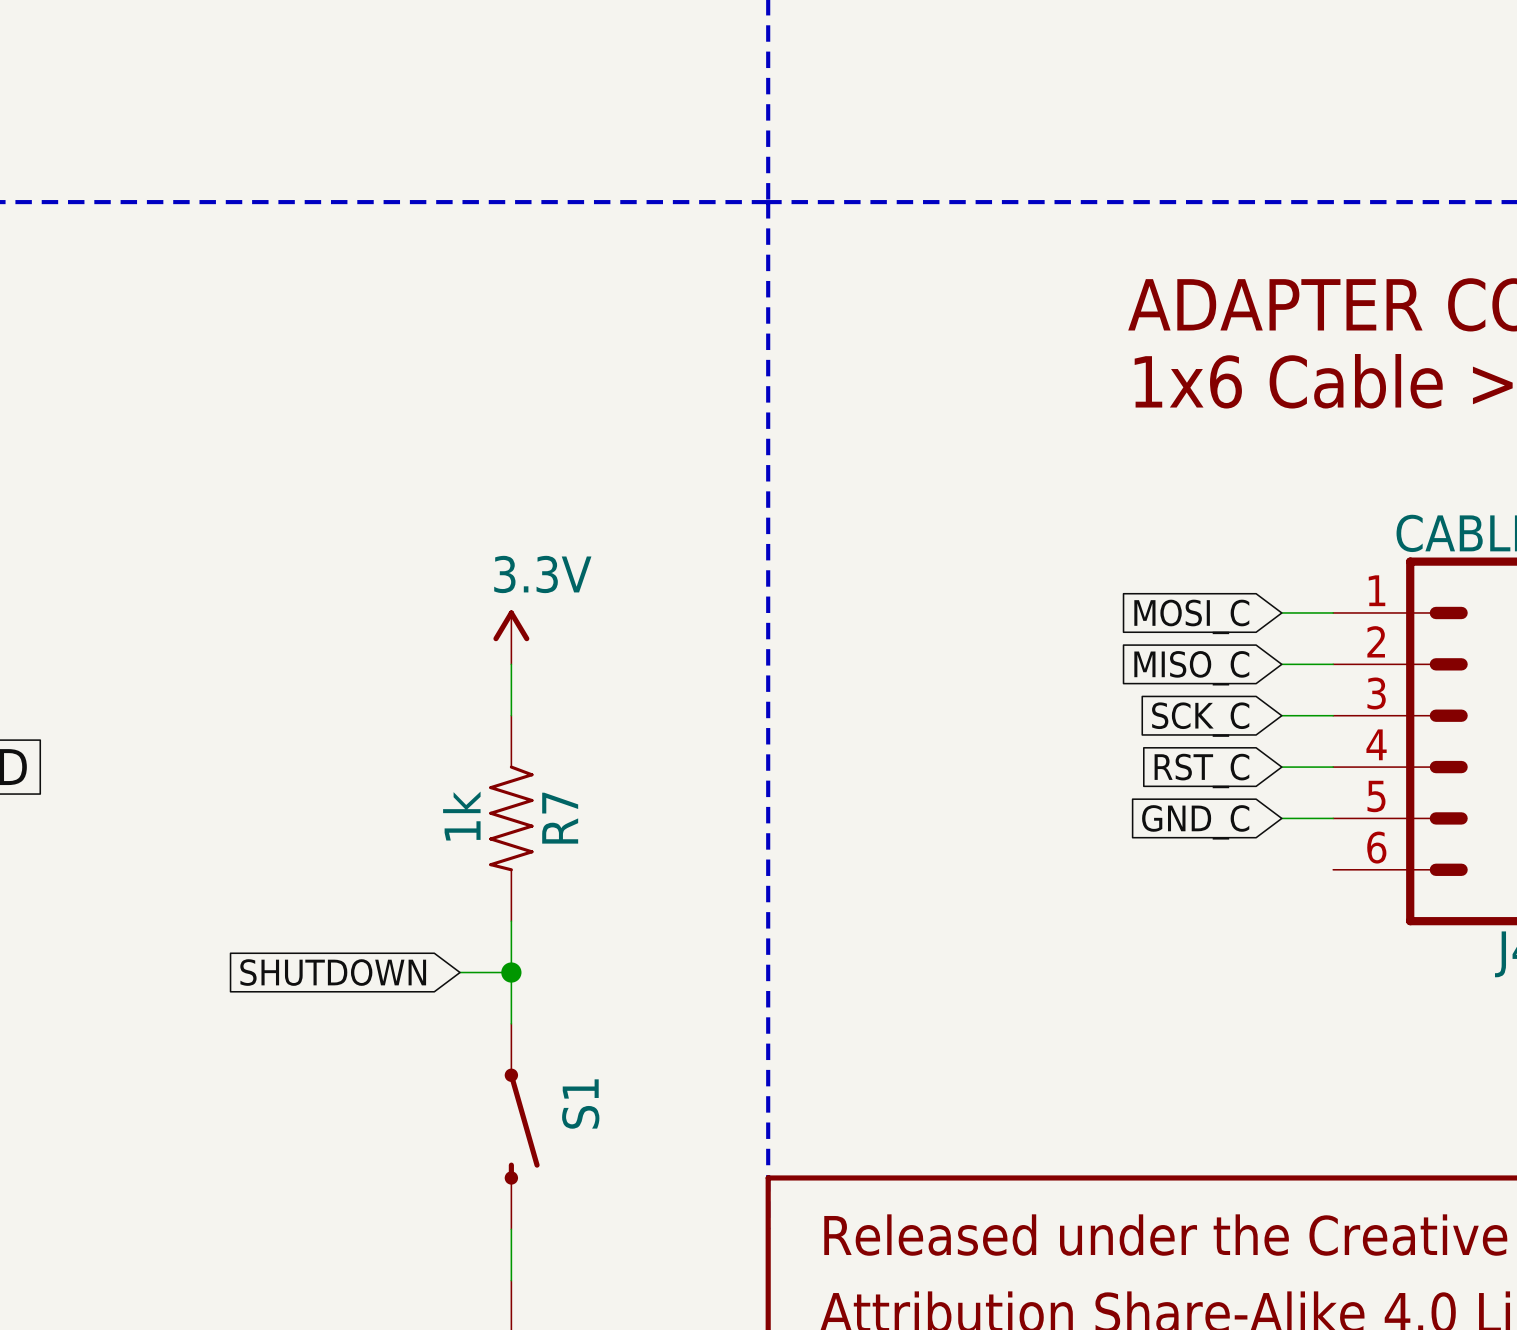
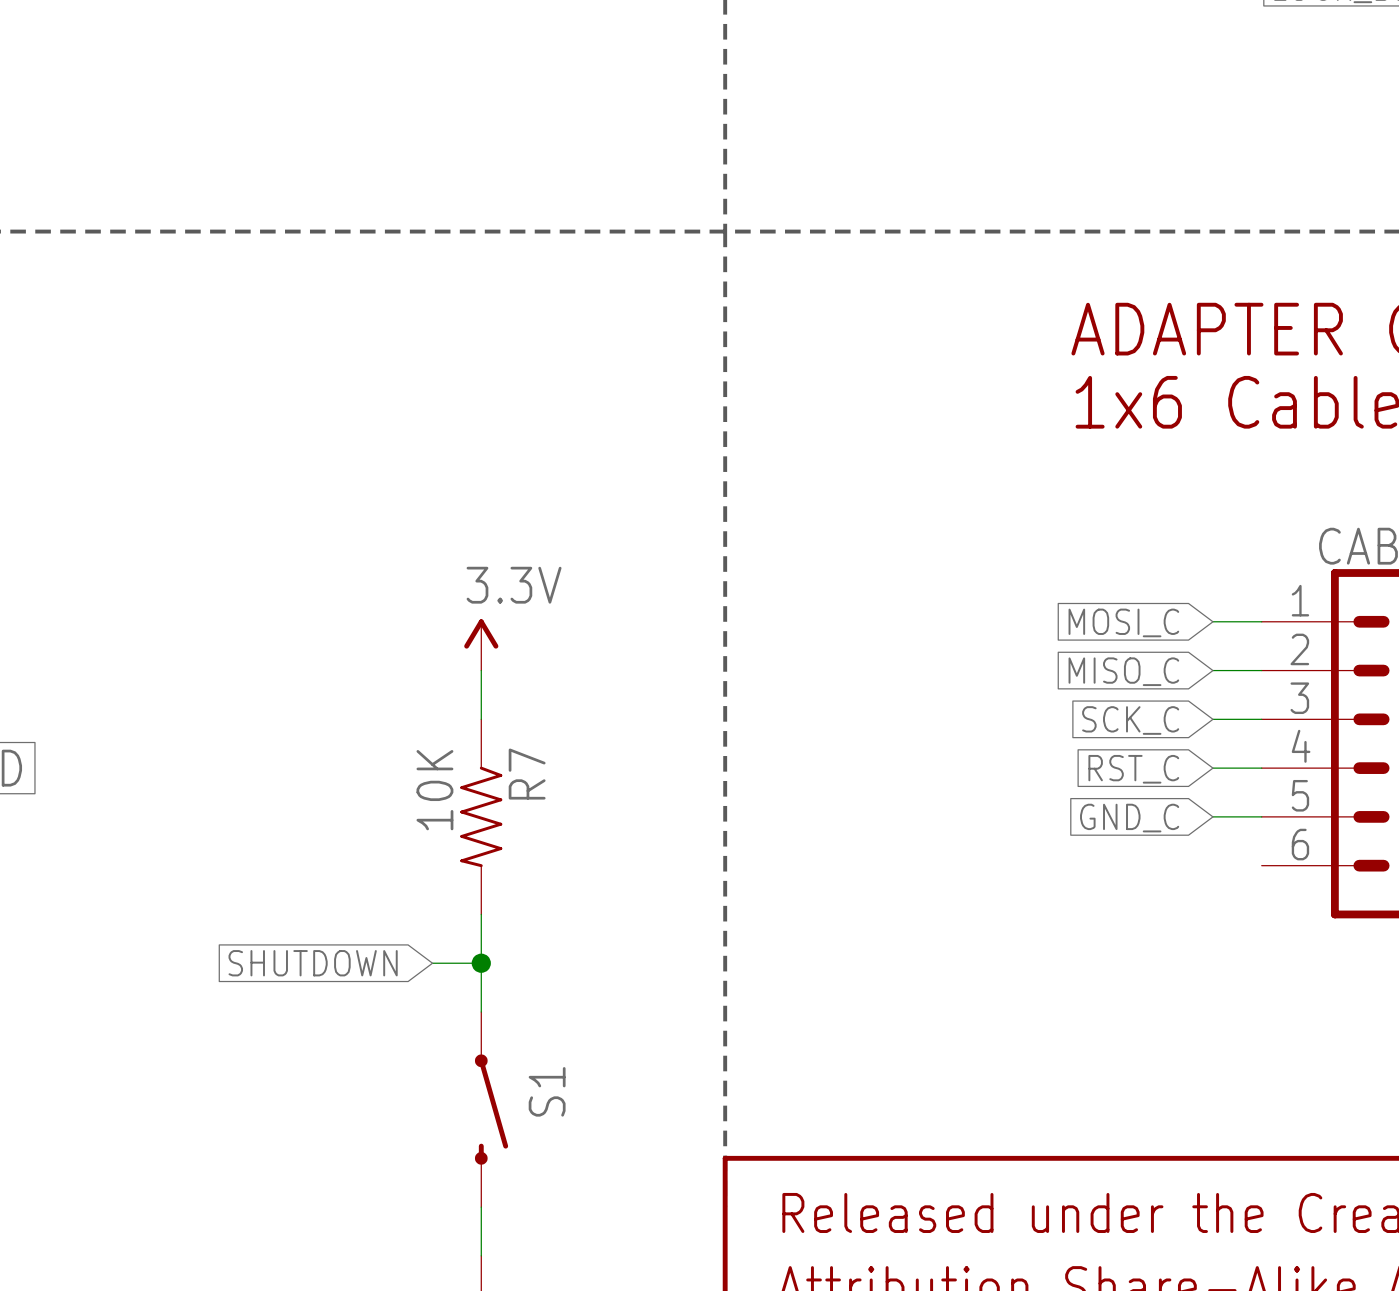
R7 value: 1k (461, 816) -> 10K (434, 790)
R7 name position: R7 (560, 818) -> R7 (527, 774)

